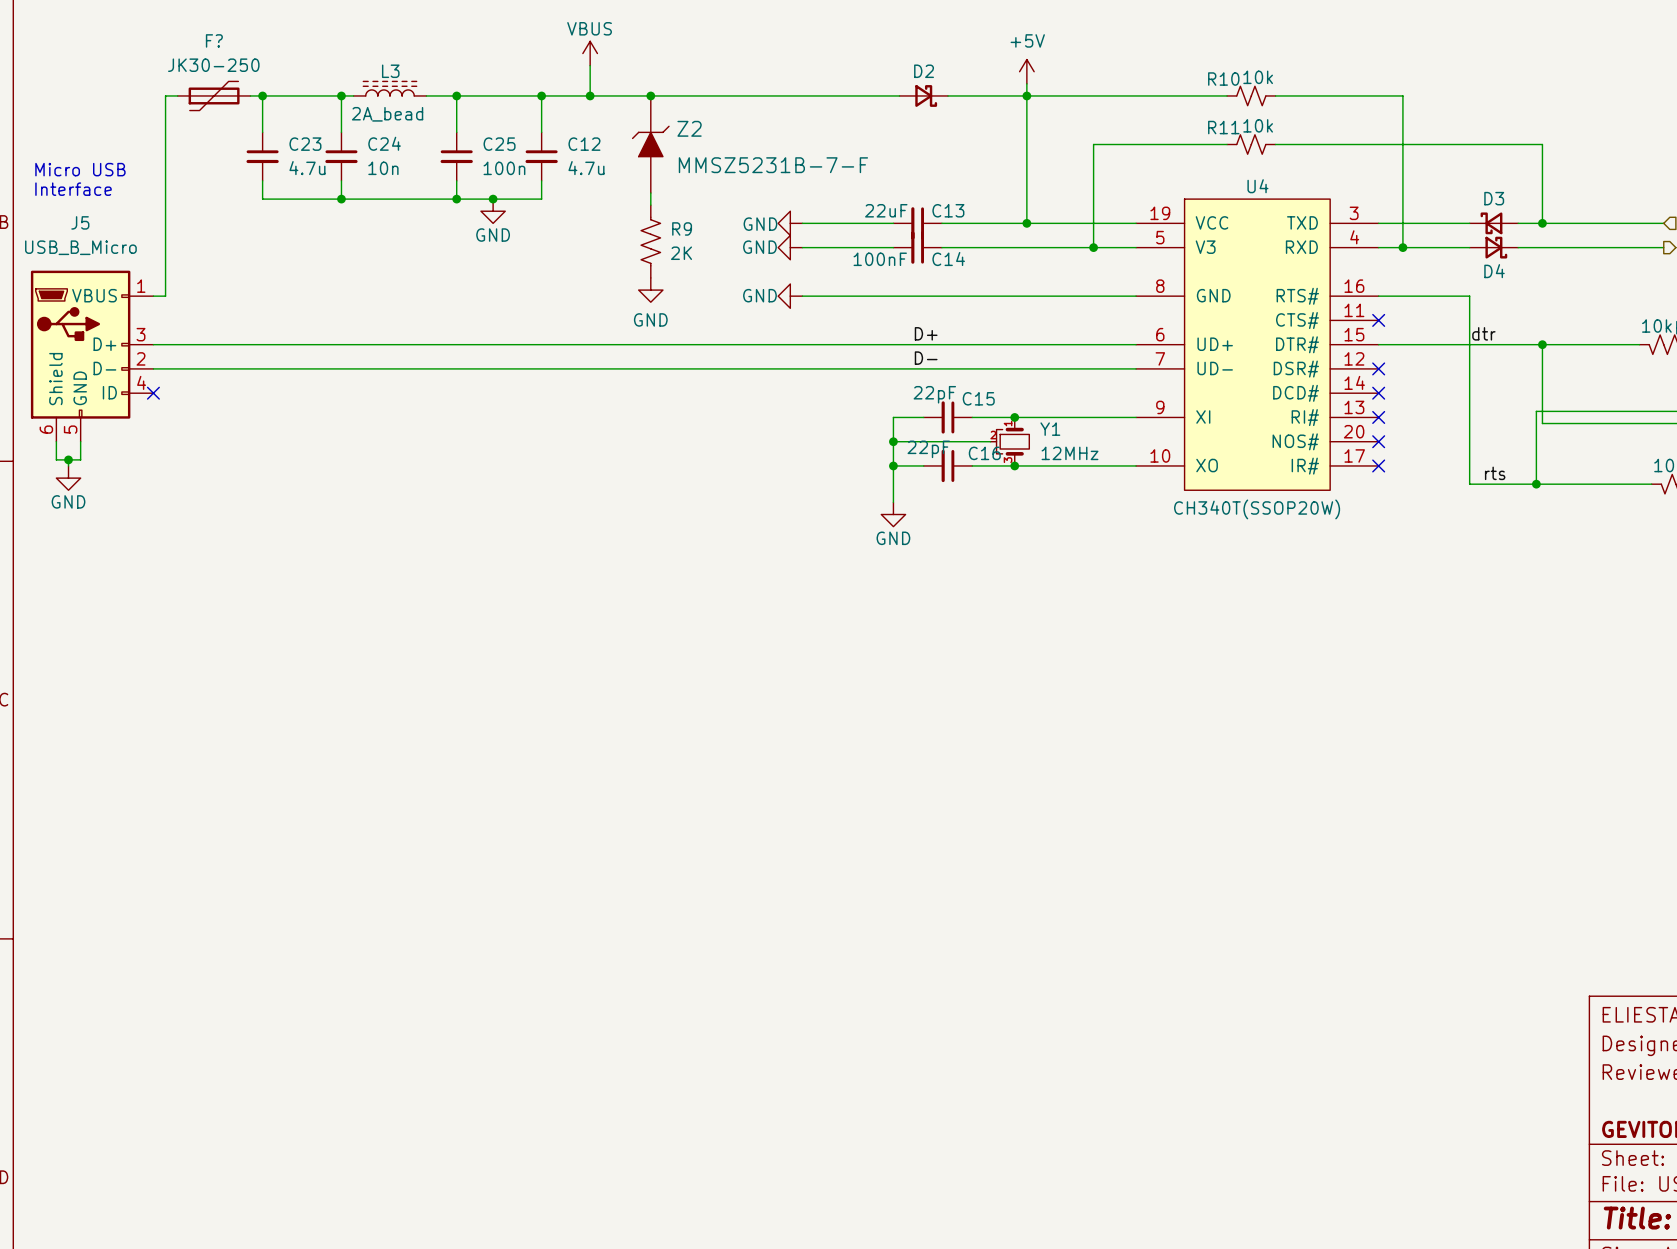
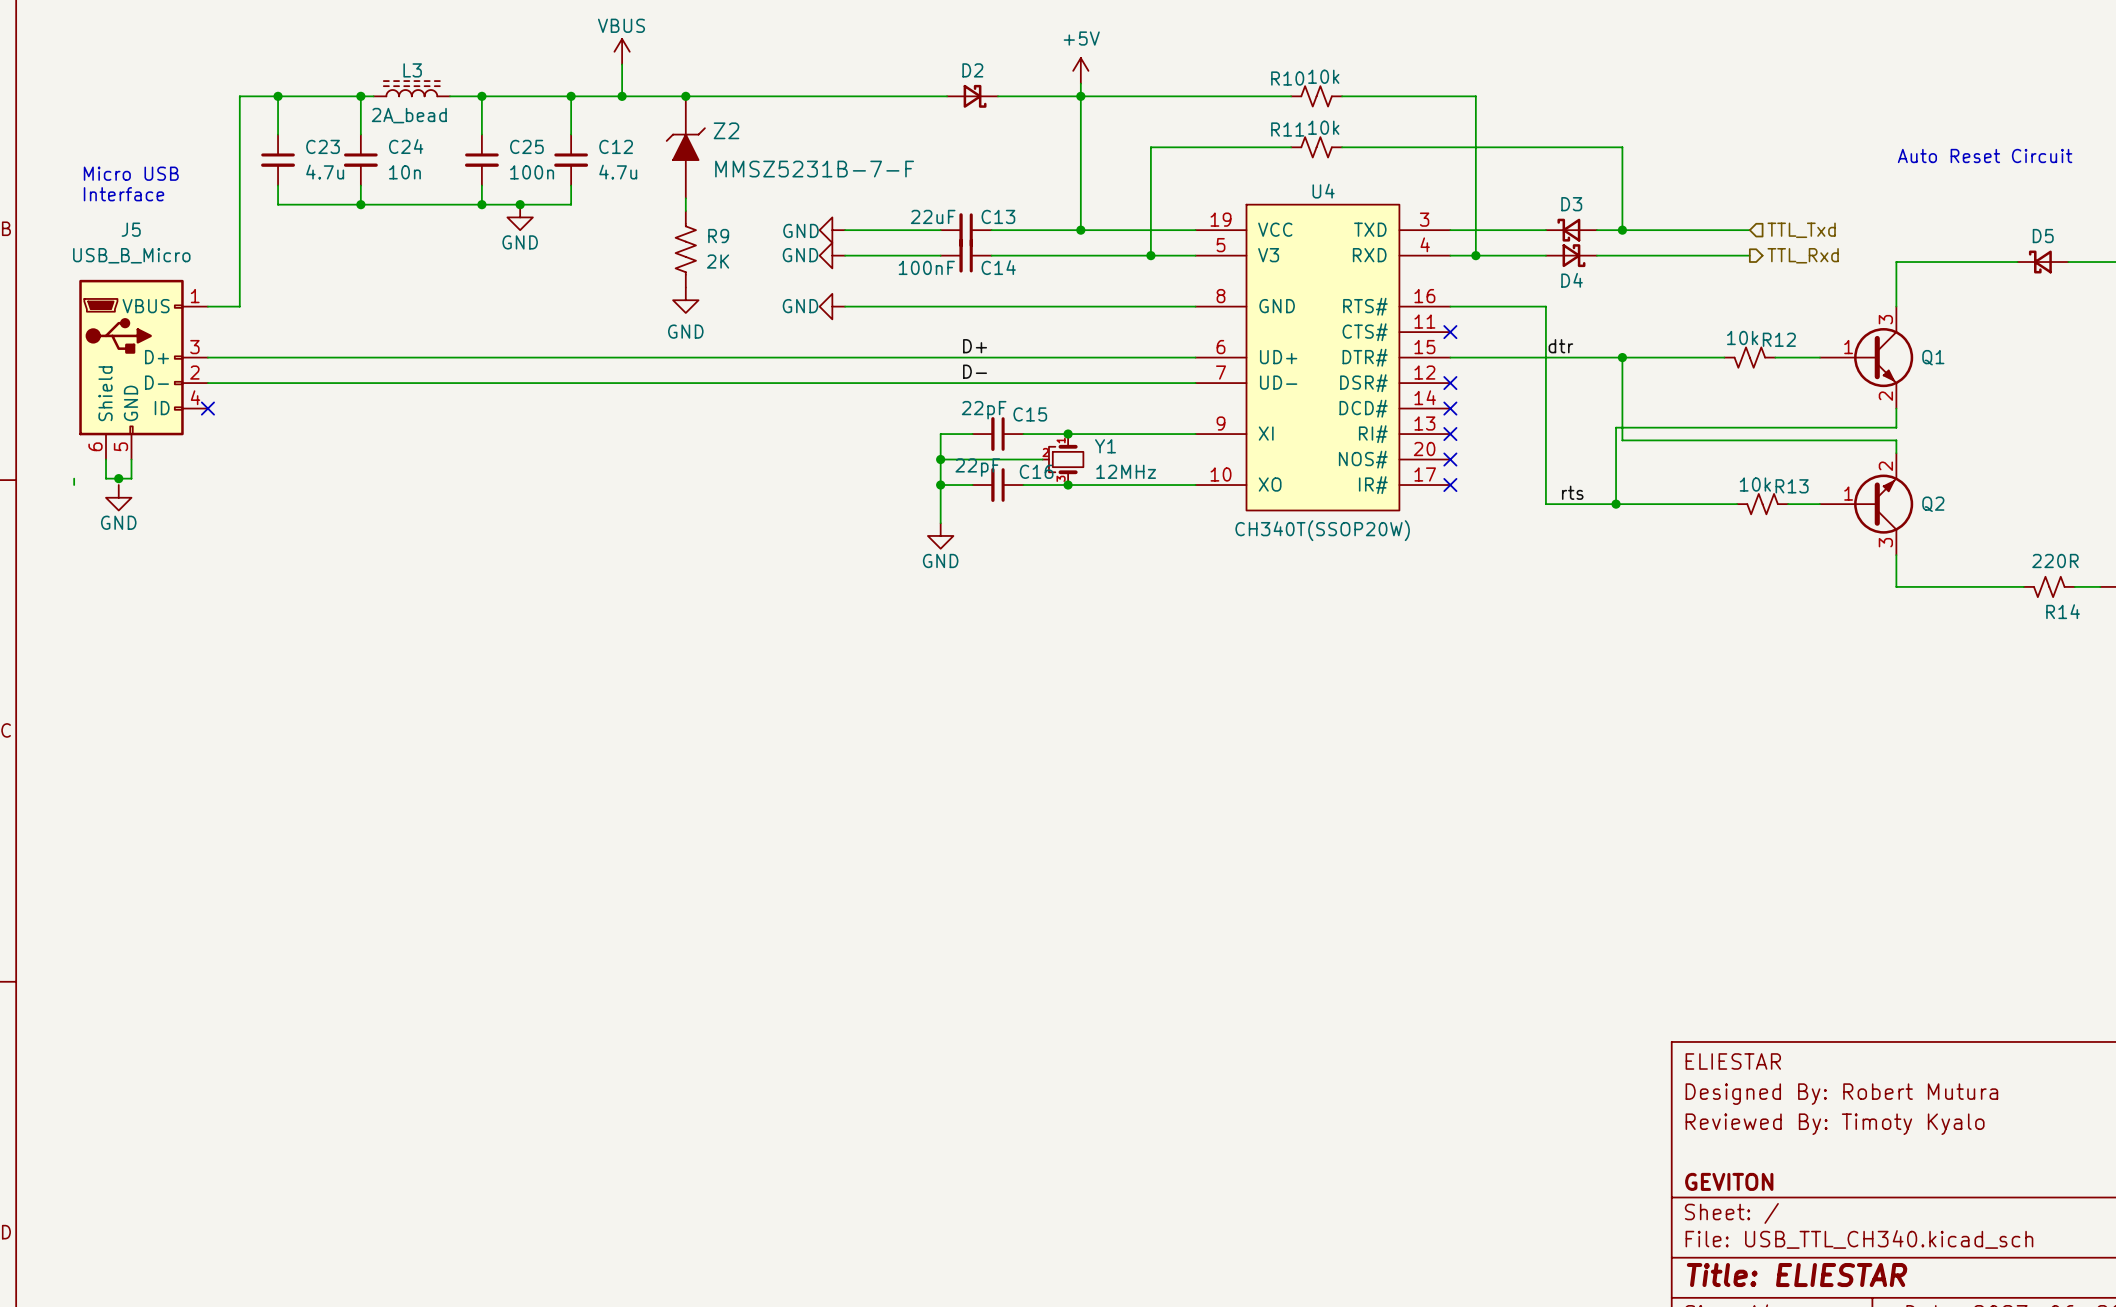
wire: (177, 95) (165, 95) (165, 296) (153, 296) -> none
F?: JK30-250 (214, 95) -> none
wire: none -> (265, 96) (239, 96) (239, 306) (207, 306)
text position: Micro USB (80, 169) -> Micro USB (131, 173)
text position: Interface (73, 189) -> Interface (124, 194)
J5 position: (92, 356) -> (143, 369)
no-connect mark position: (153, 393) -> (207, 408)
wire: (56, 441) (56, 459) (80, 459) (80, 441) -> (106, 459) (106, 478) (131, 478) (131, 459)
junction position: (68, 459) -> (118, 478)
power symbol position: GND (68, 478) -> GND (118, 497)

